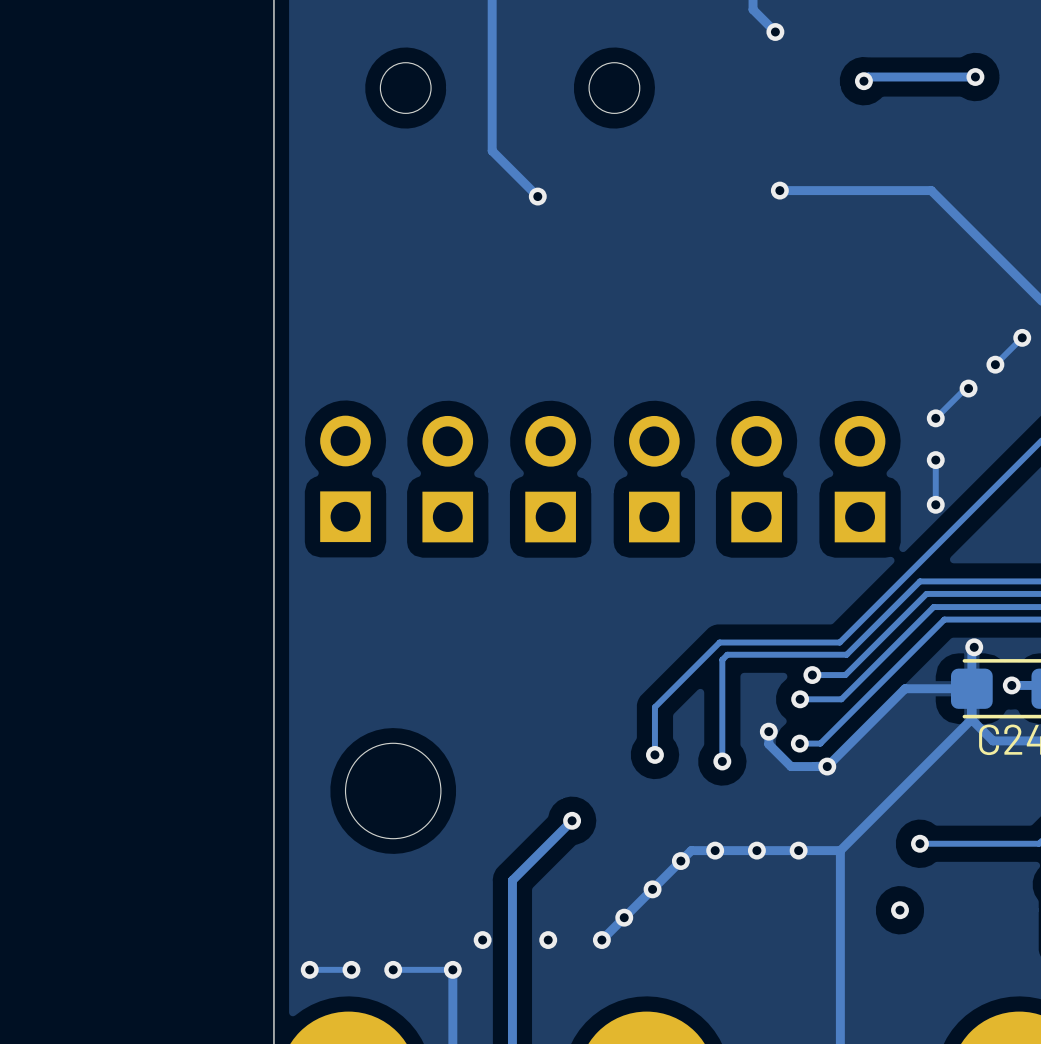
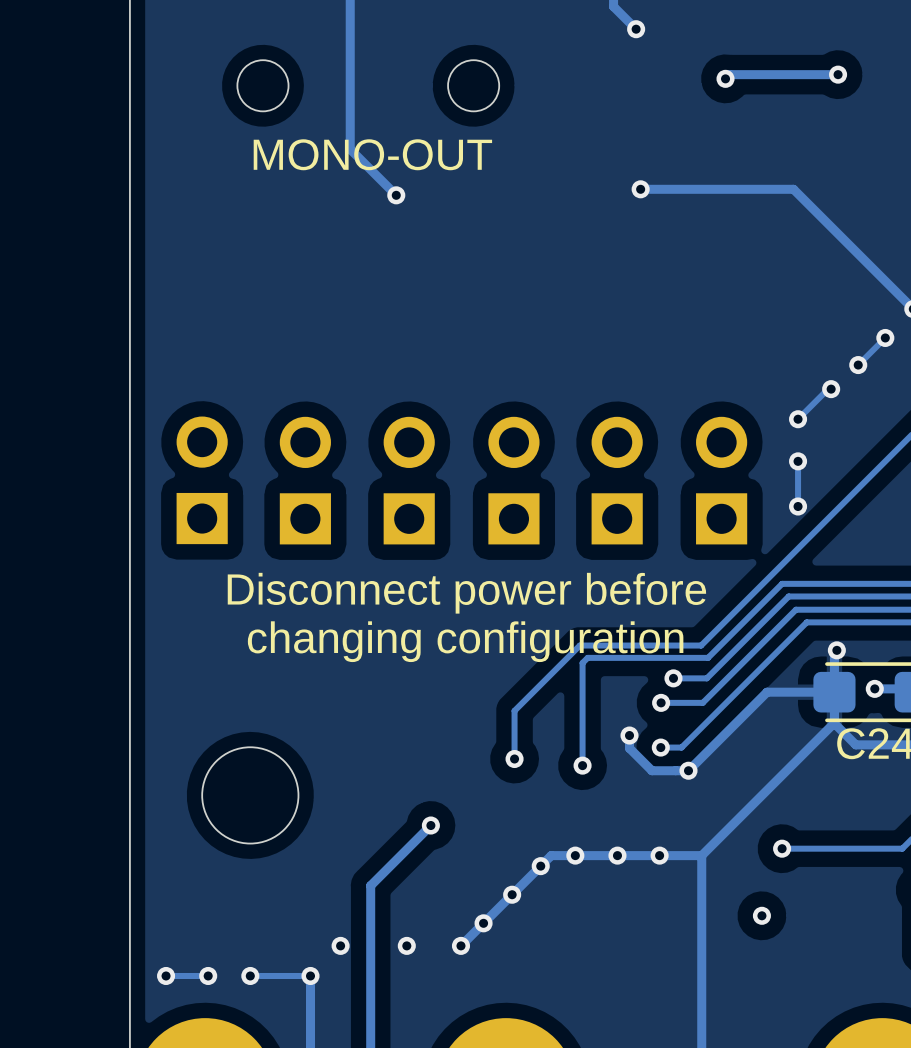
text: none -> MONO-OUT (372, 154)
text: none -> Disconnect power before (466, 593)
text: none -> changing configuration (465, 641)

